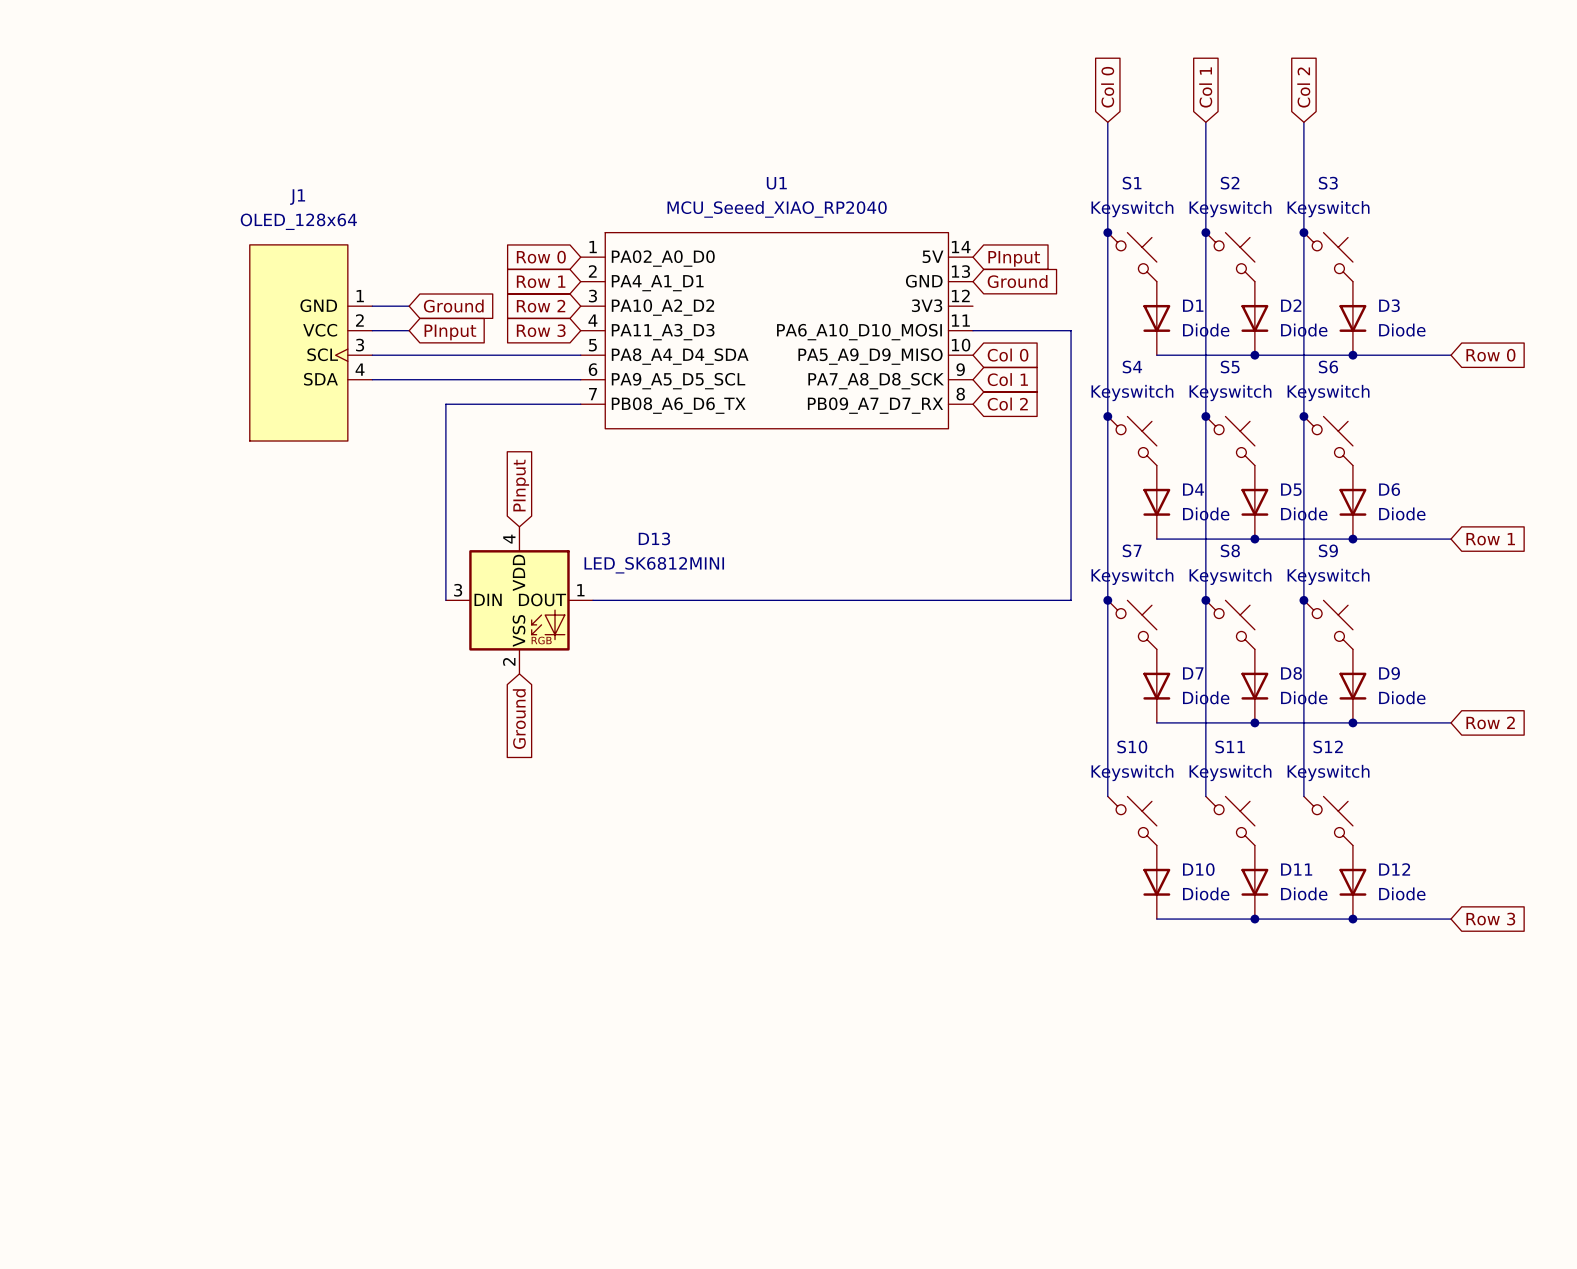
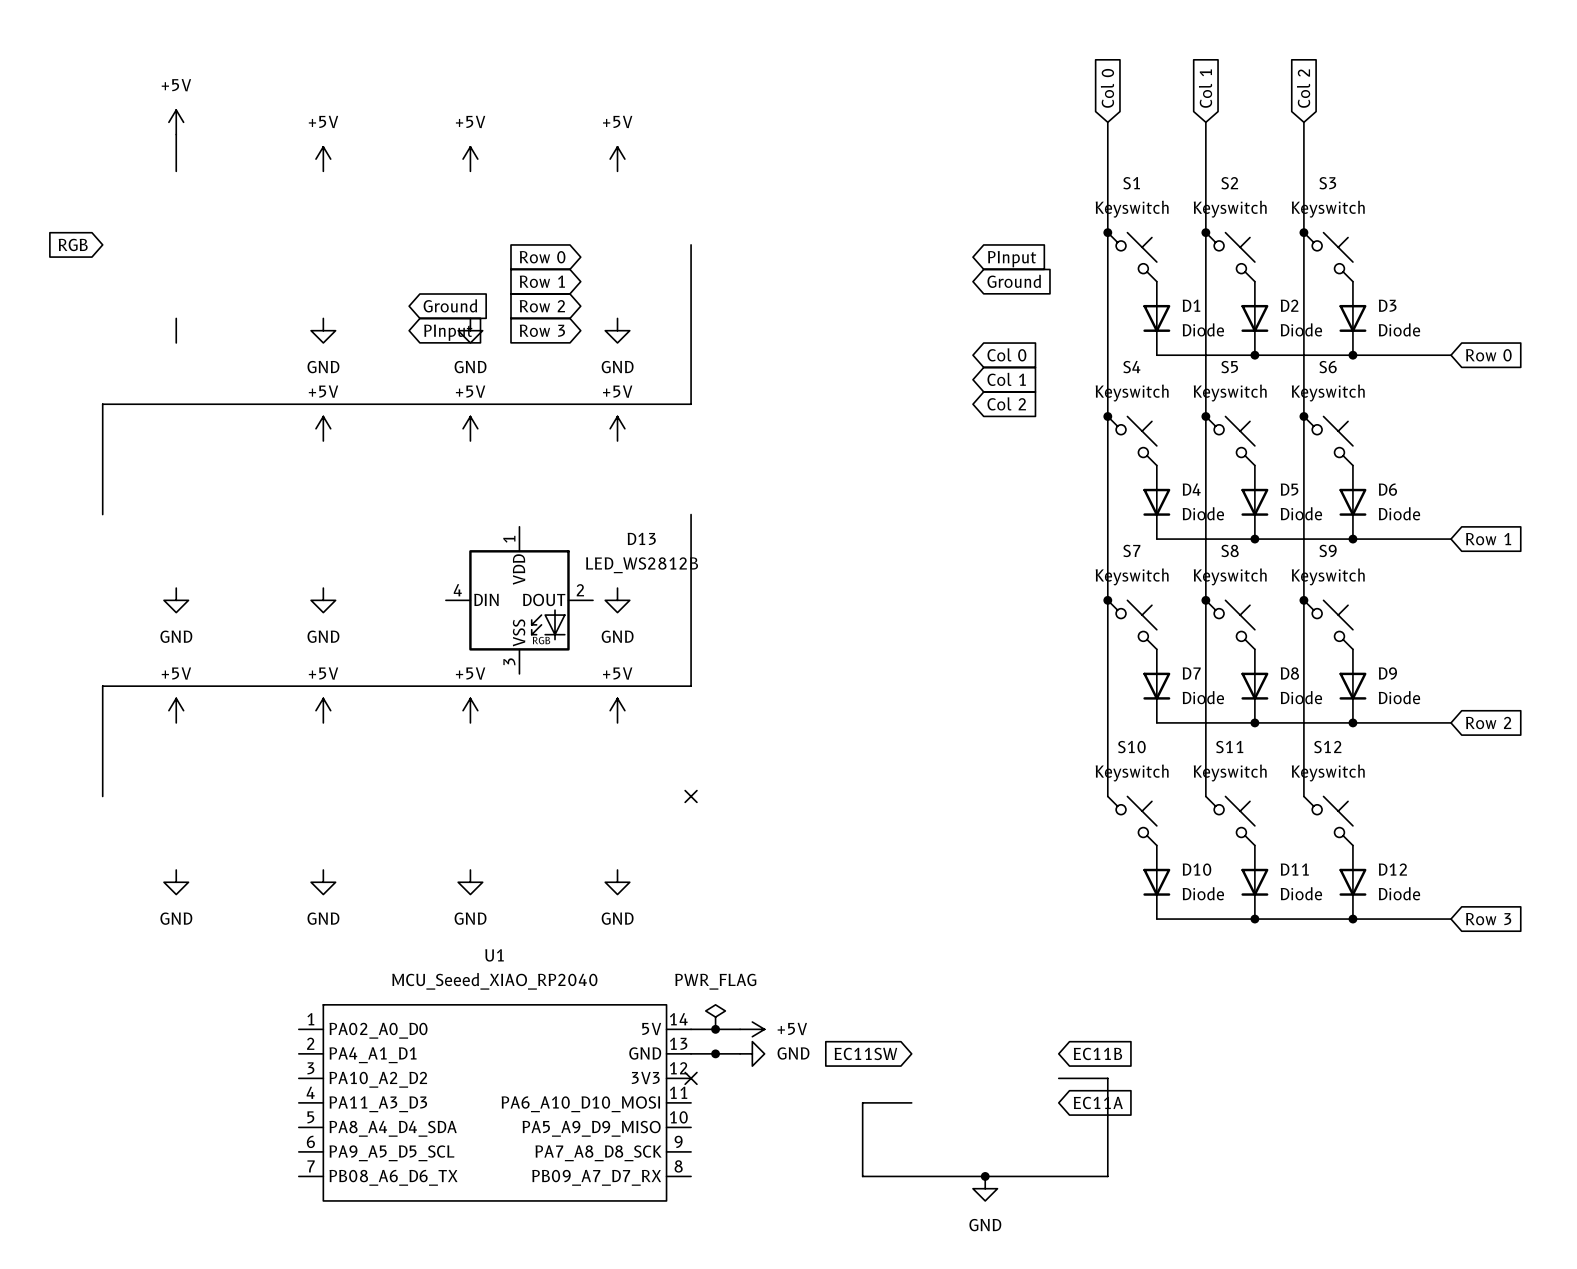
power symbol: none -> +5V (176, 122)
wire: none -> (176, 134) (176, 171)
power symbol: none -> +5V (323, 159)
power symbol: none -> +5V (470, 159)
power symbol: none -> +5V (617, 159)
global label: none -> RGB (73, 244)
wire: none -> (691, 244) (691, 404) (580, 404)
wire: (372, 306) (409, 306) -> none
wire: none -> (176, 318) (176, 342)
power symbol: none -> GND (323, 330)
wire: (372, 330) (409, 330) -> none
power symbol: none -> GND (470, 330)
power symbol: none -> GND (617, 330)
U1 position: (776, 330) -> (494, 1102)
wire: (972, 330) (1071, 330) (1071, 600) (593, 600) -> none
J1: OLED_128x64 (311, 342) -> none
wire: (372, 355) (580, 355) -> none
wire: (372, 379) (580, 379) -> none
wire: (445, 404) (445, 600) -> (445, 404) (102, 404) (102, 514)
power symbol: none -> +5V (323, 428)
power symbol: none -> +5V (470, 428)
power symbol: none -> +5V (617, 428)
global label: PInput (521, 485) -> none
wire: none -> (691, 514) (691, 686) (102, 686) (102, 796)
D13 name position: D13 (654, 538) -> D13 (641, 538)
D13 pin number: 4 (509, 539) -> 1 (509, 539)
D13 value: LED_SK6812MINI (654, 565) -> LED_WS2812B (642, 565)
D13 pin number: 3 (458, 590) -> 4 (457, 590)
D13 pin number: 1 (580, 590) -> 2 (580, 590)
power symbol: none -> GND (176, 600)
power symbol: none -> GND (323, 600)
power symbol: none -> GND (617, 600)
D13 pin number: 2 (509, 661) -> 3 (509, 661)
power symbol: none -> +5V (176, 710)
power symbol: none -> +5V (323, 710)
power symbol: none -> +5V (470, 710)
power symbol: none -> +5V (617, 710)
global label: Ground (519, 719) -> none
no-connect mark: none -> (691, 796)
power symbol: none -> GND (176, 882)
power symbol: none -> GND (323, 882)
power symbol: none -> GND (470, 882)
power symbol: none -> GND (617, 882)
power symbol: none -> PWR_FLAG (715, 1017)
wire: none -> (691, 1029) (740, 1029)
junction: none -> (715, 1029)
power symbol: none -> +5V (752, 1029)
wire: none -> (691, 1053) (740, 1053)
junction: none -> (715, 1053)
power symbol: none -> GND (752, 1053)
global label: none -> EC11SW (865, 1053)
global label: none -> EC11B (1097, 1053)
no-connect mark: none -> (691, 1078)
wire: none -> (1058, 1078) (1107, 1078) (1107, 1176) (862, 1176) (862, 1102) (911, 1102)
global label: none -> EC11A (1098, 1102)
junction: none -> (985, 1176)
power symbol: none -> GND (985, 1188)

